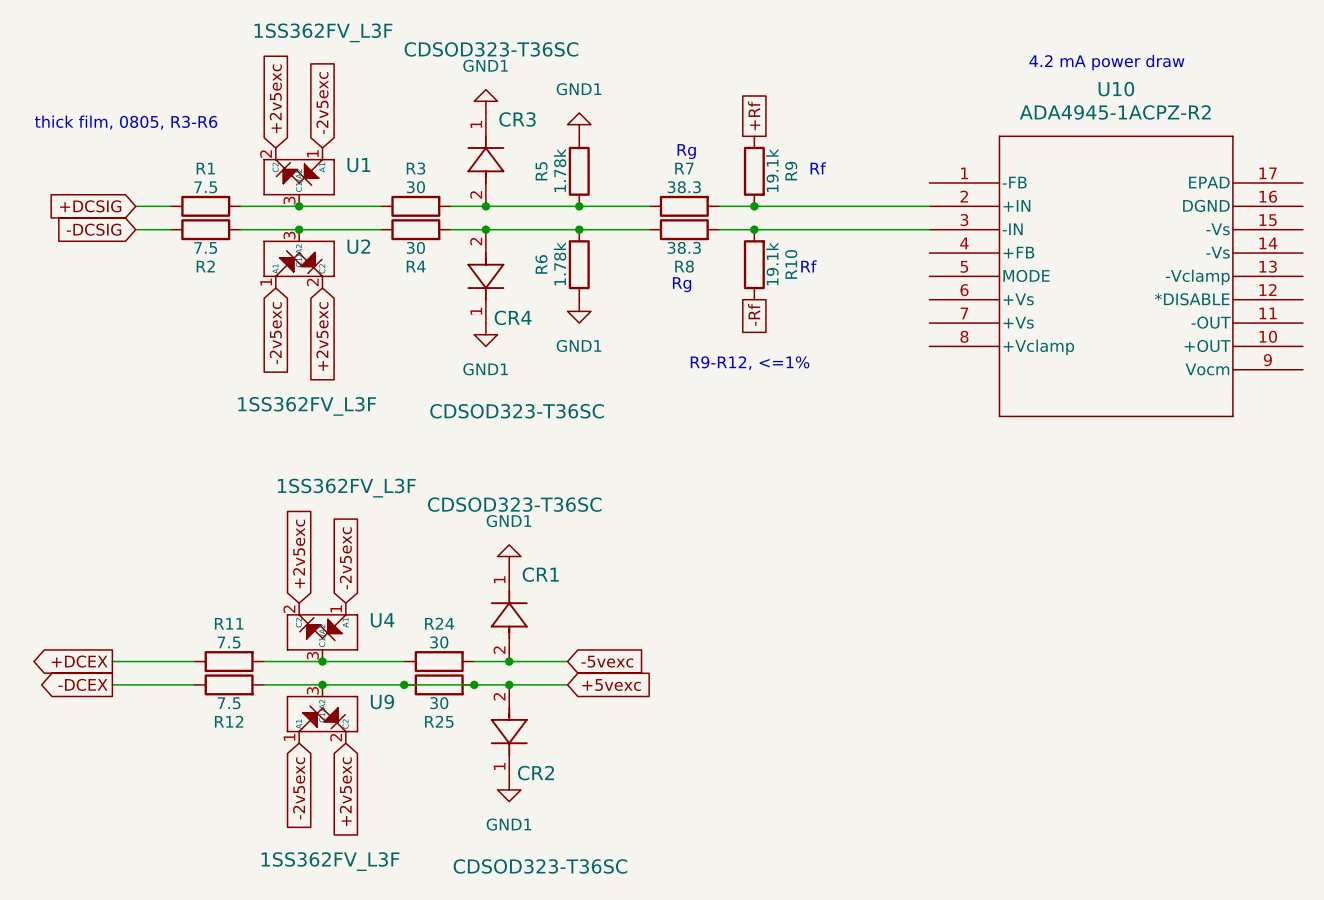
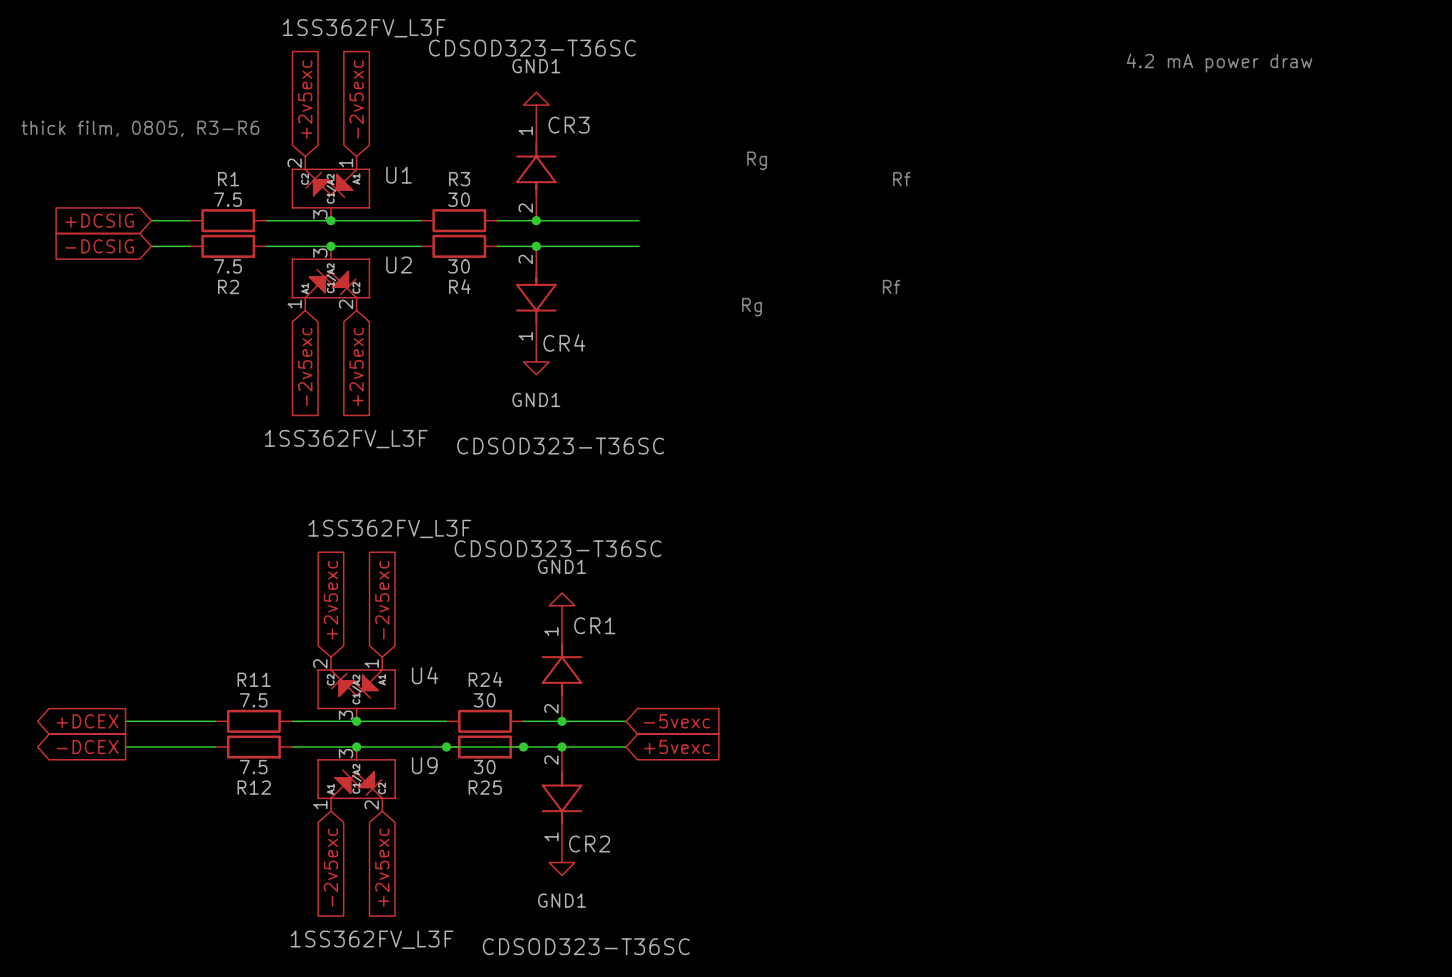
global label: +Rf (754, 115) -> none
power symbol: GND1 (579, 124) -> none
R5: 1.78k (579, 171) -> none
R9: 19.1k (754, 171) -> none
wire: (579, 206) (649, 206) -> none
junction: (579, 206) -> none
R7: 38.3 (684, 206) -> none
wire: (719, 206) (929, 206) -> none
junction: (754, 206) -> none
wire: (579, 229) (649, 229) -> none
junction: (579, 229) -> none
R8: 38.3 (684, 229) -> none
wire: (719, 229) (929, 229) -> none
junction: (754, 229) -> none
R6: 1.78k (579, 264) -> none
R10: 19.1k (754, 264) -> none
U10: ADA4945-1ACPZ-R2 (1116, 276) -> none
power symbol: GND1 (579, 311) -> none
global label: -Rf (754, 314) -> none
text: R9-R12, <=1% (750, 363) -> none

